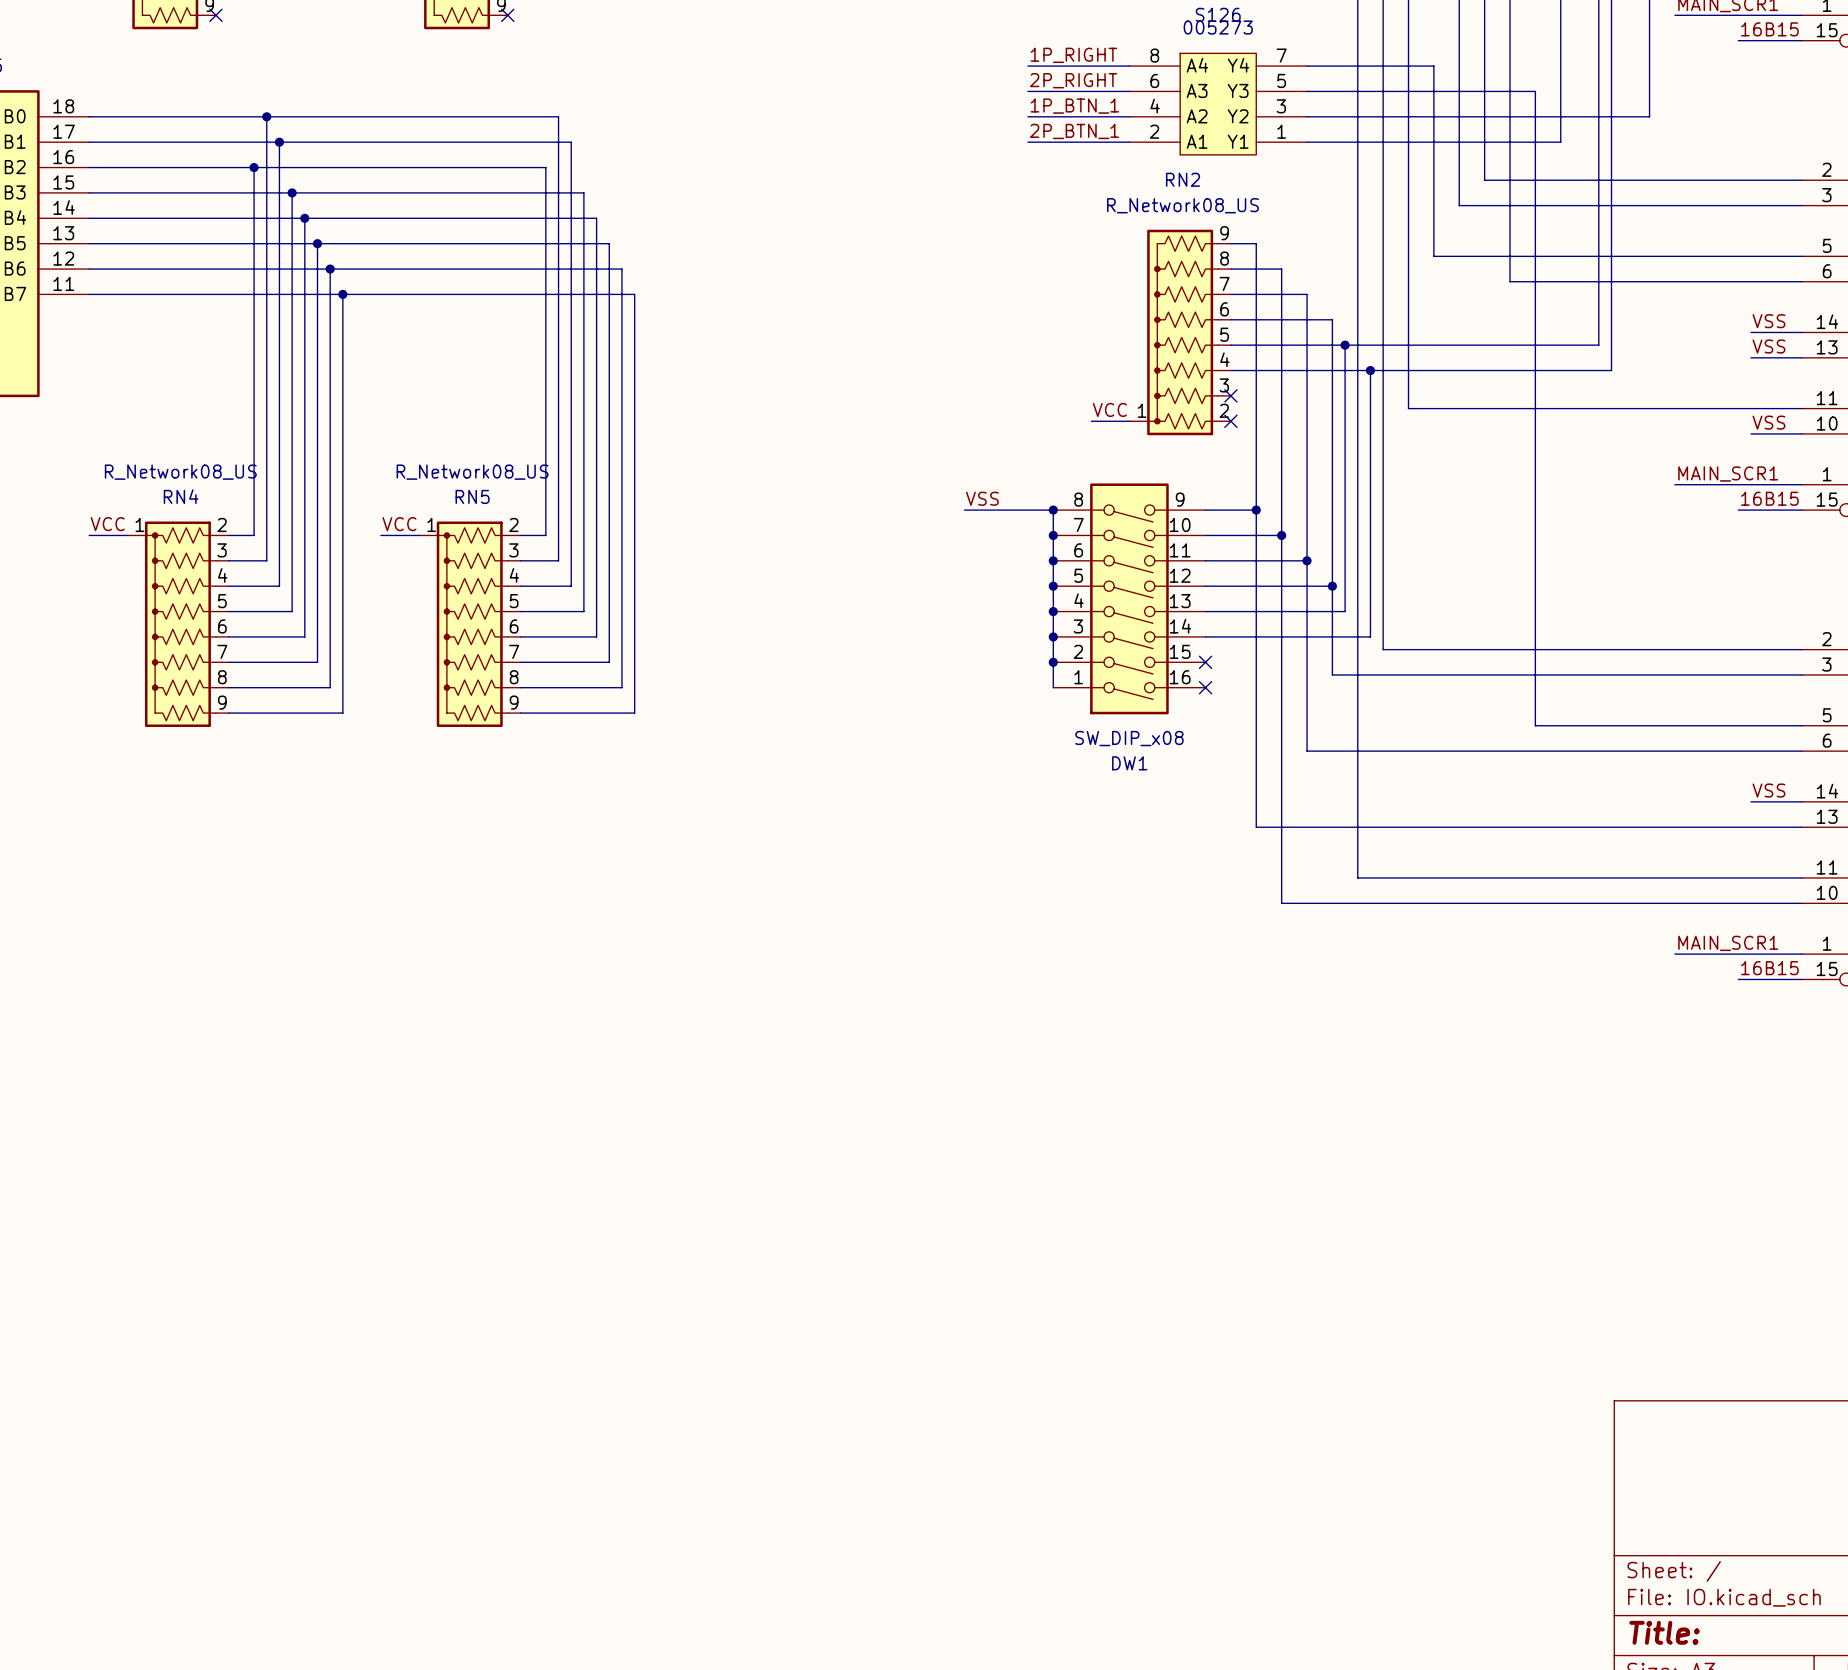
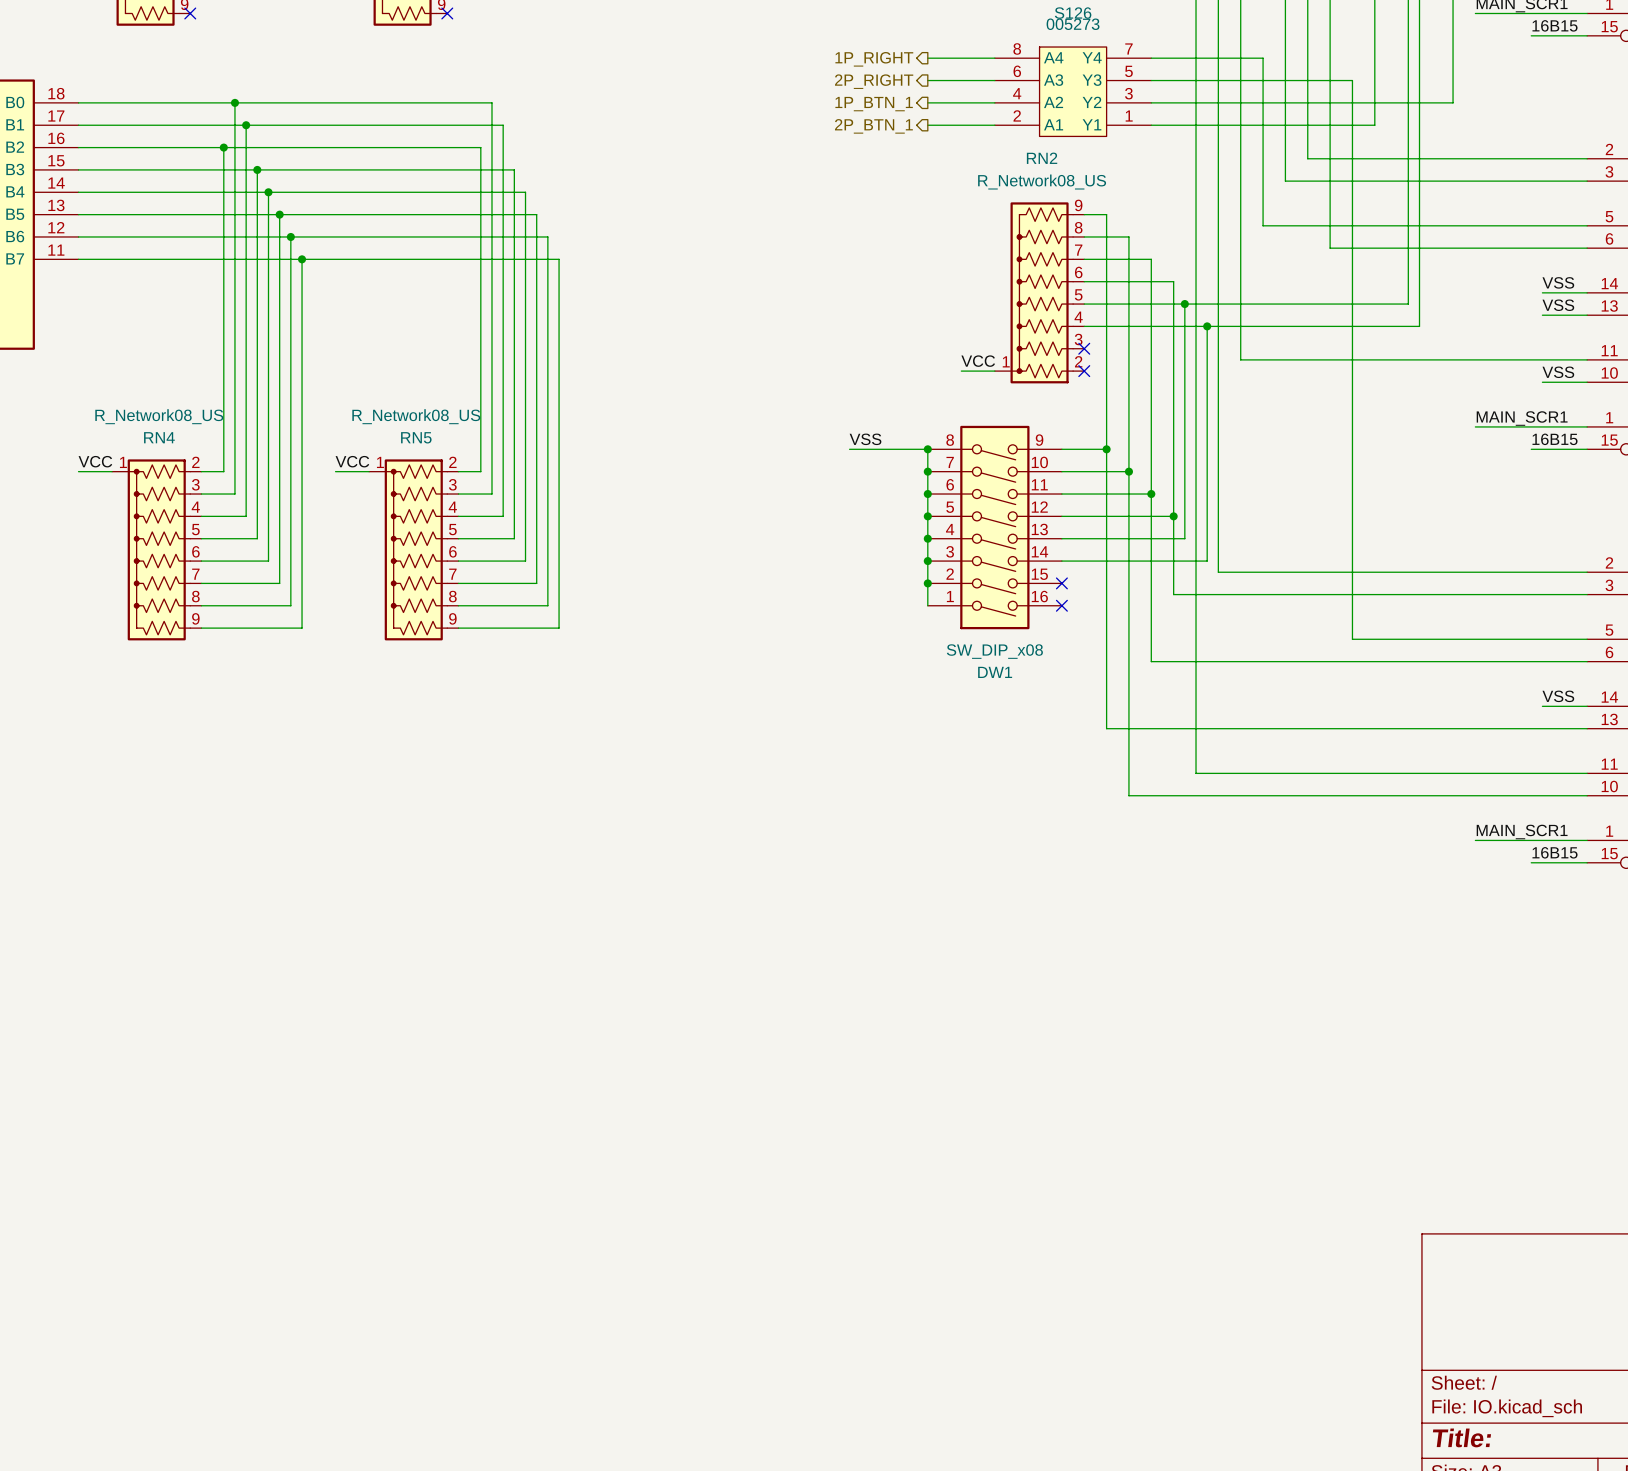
label: 1P_RIGHT (1073, 55) -> none
hierarchical label: none -> 1P_RIGHT (874, 59)
wire: (1027, 66) (1053, 66) -> none
label: 2P_RIGHT (1073, 80) -> none
hierarchical label: none -> 2P_RIGHT (874, 81)
wire: (1027, 91) (1053, 91) -> none
label: 1P_BTN_1 (1074, 106) -> none
hierarchical label: none -> 1P_BTN_1 (874, 104)
wire: (1027, 116) (1053, 116) -> none
label: 2P_BTN_1 (1074, 131) -> none
hierarchical label: none -> 2P_BTN_1 (873, 126)
wire: (1027, 142) (1053, 142) -> none

